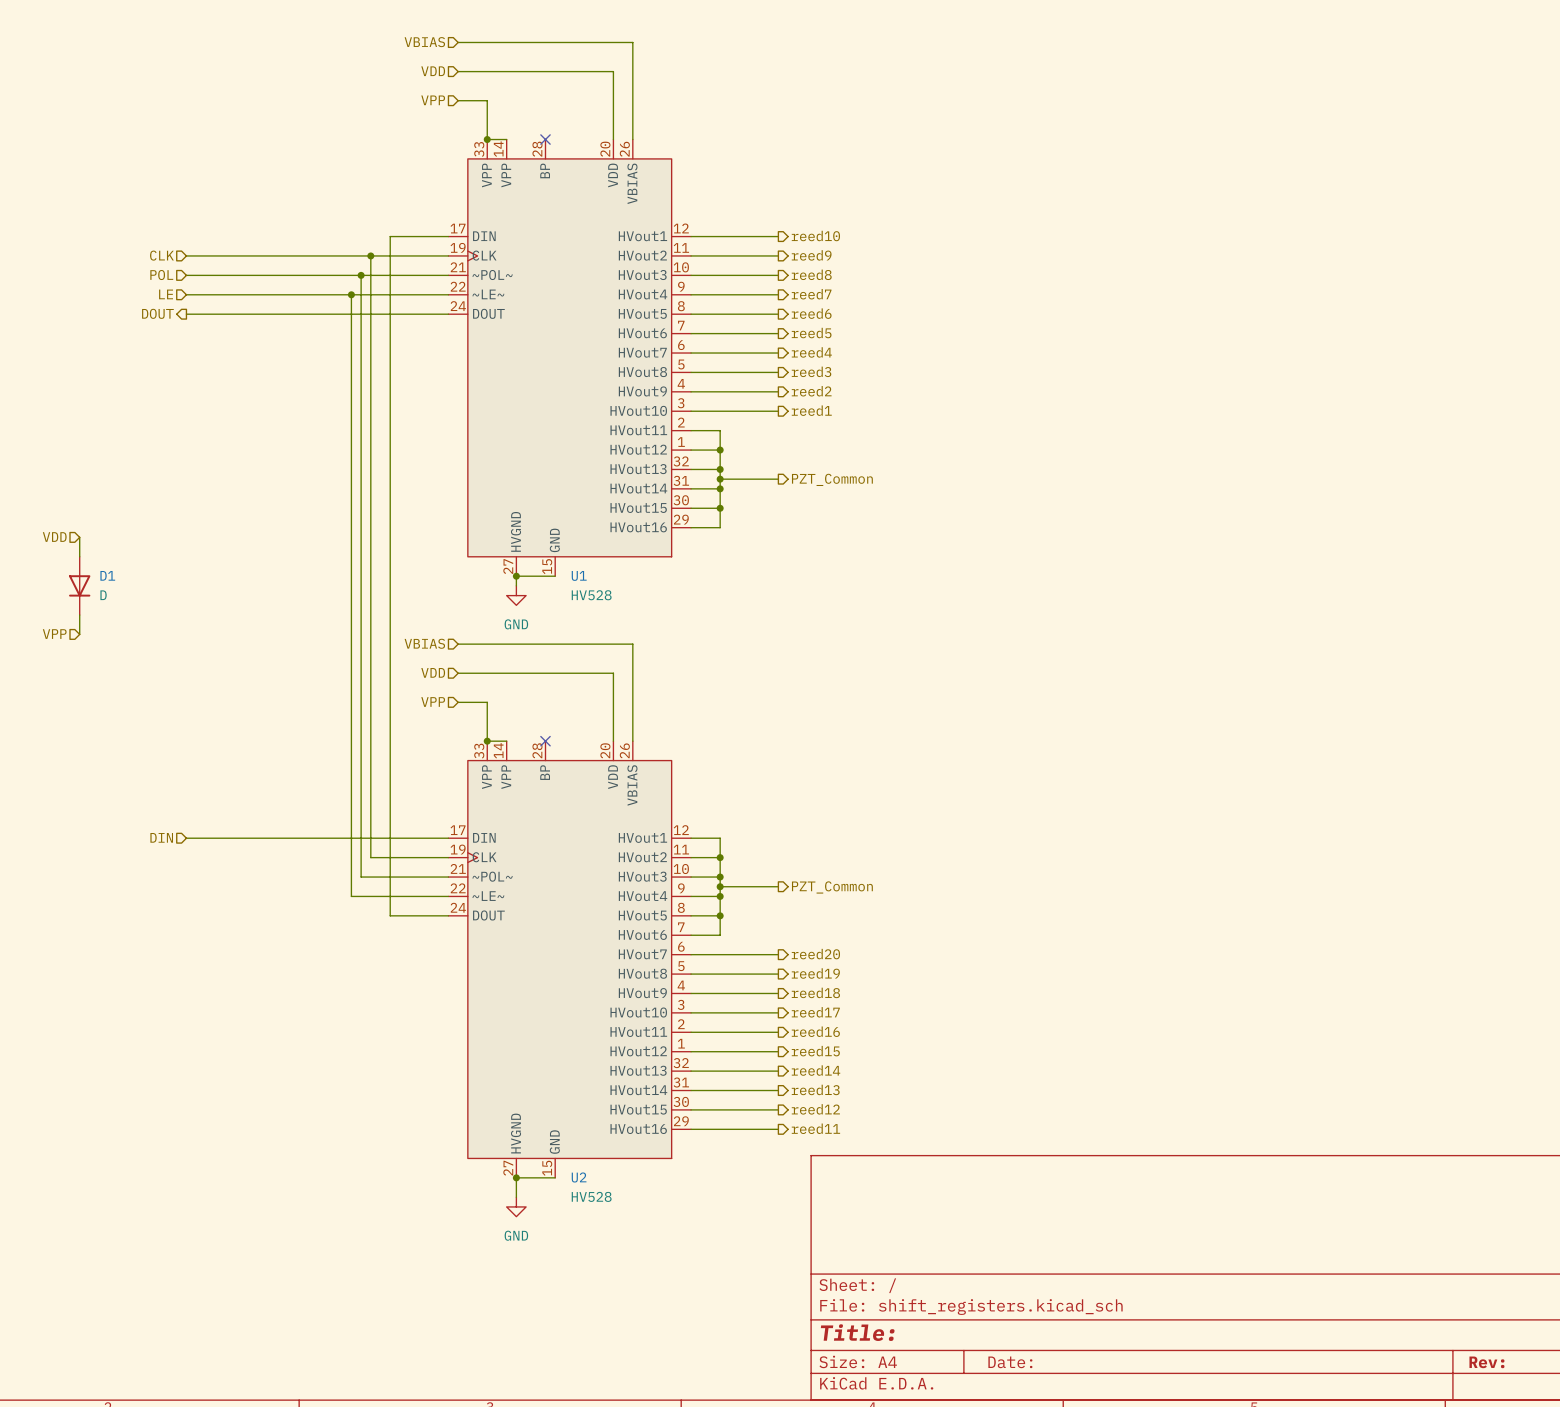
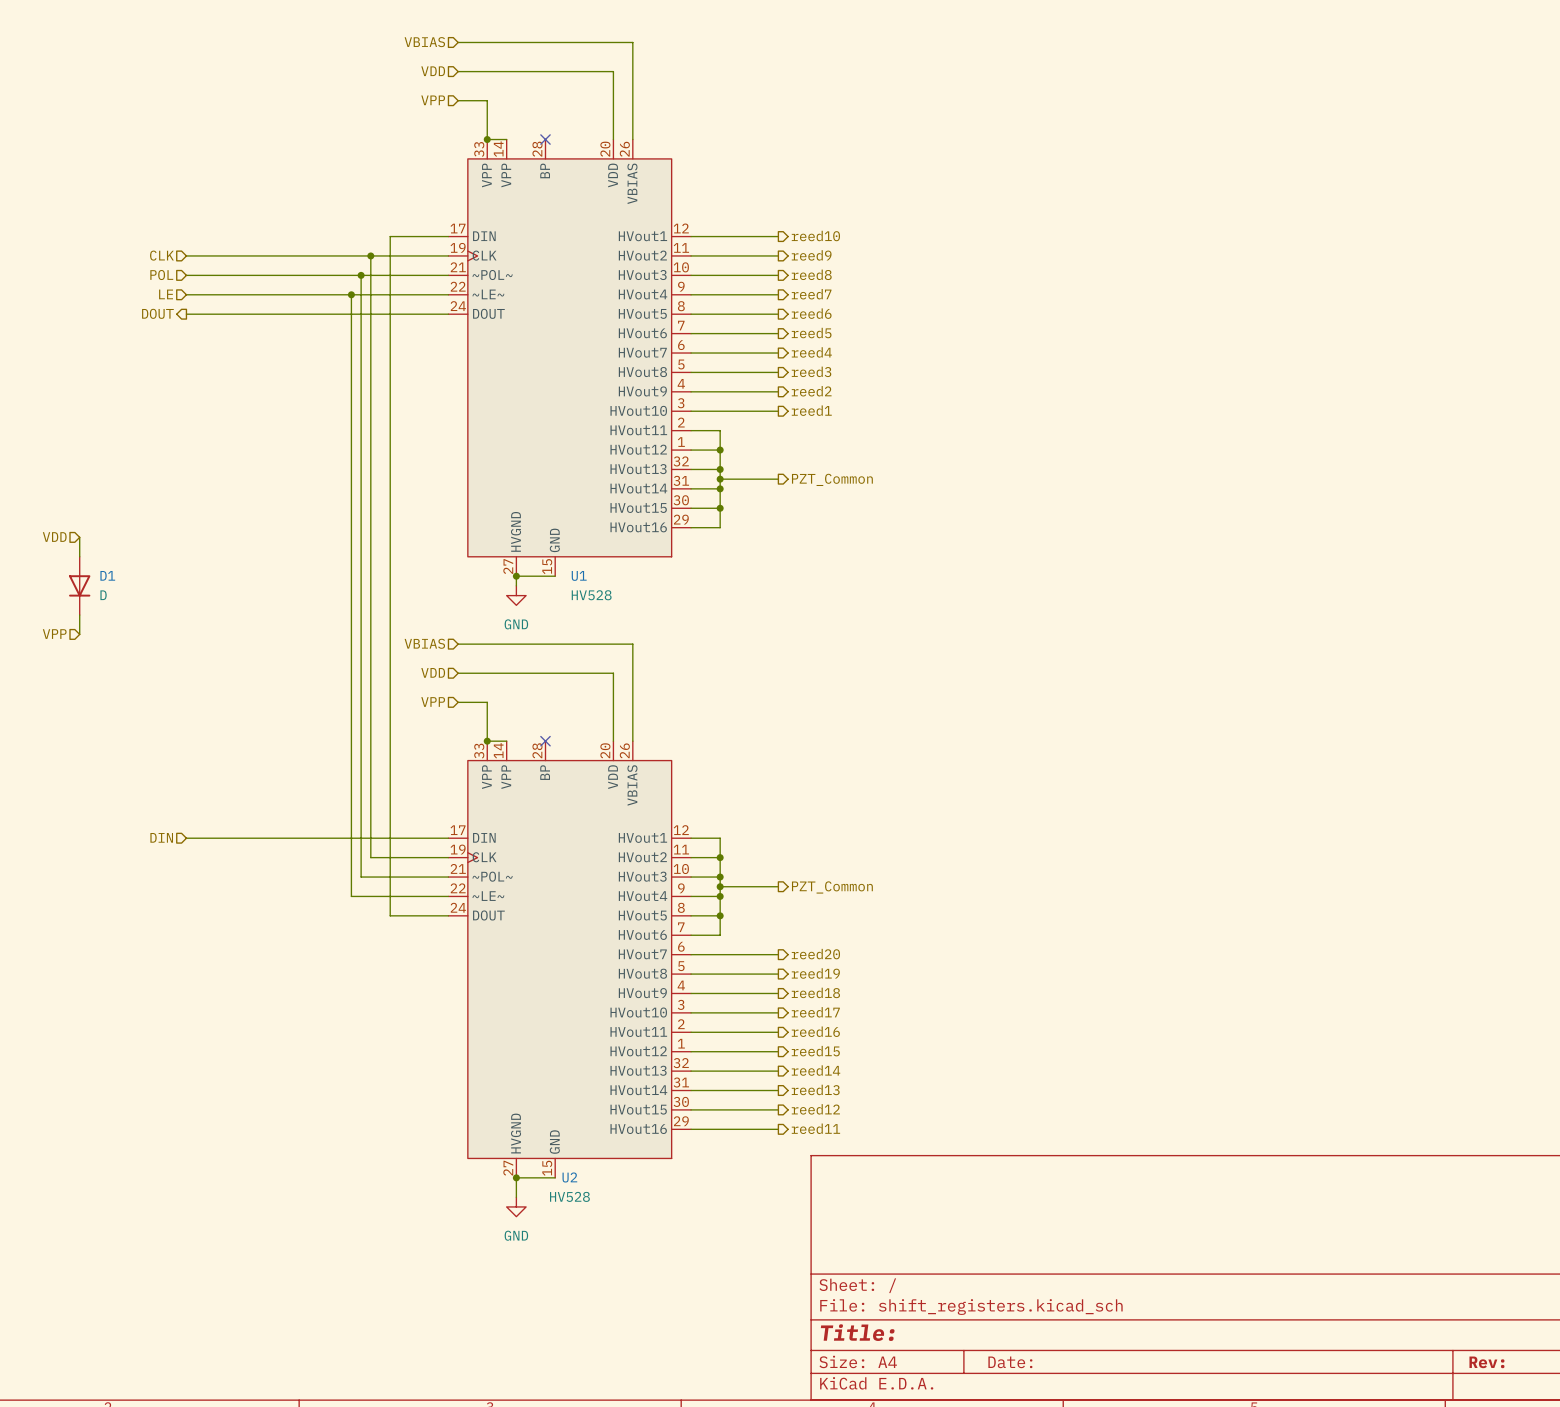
U2 name position: U2 (579, 1177) -> U2 (569, 1177)
U2 value position: HV528 (591, 1196) -> HV528 (569, 1196)

